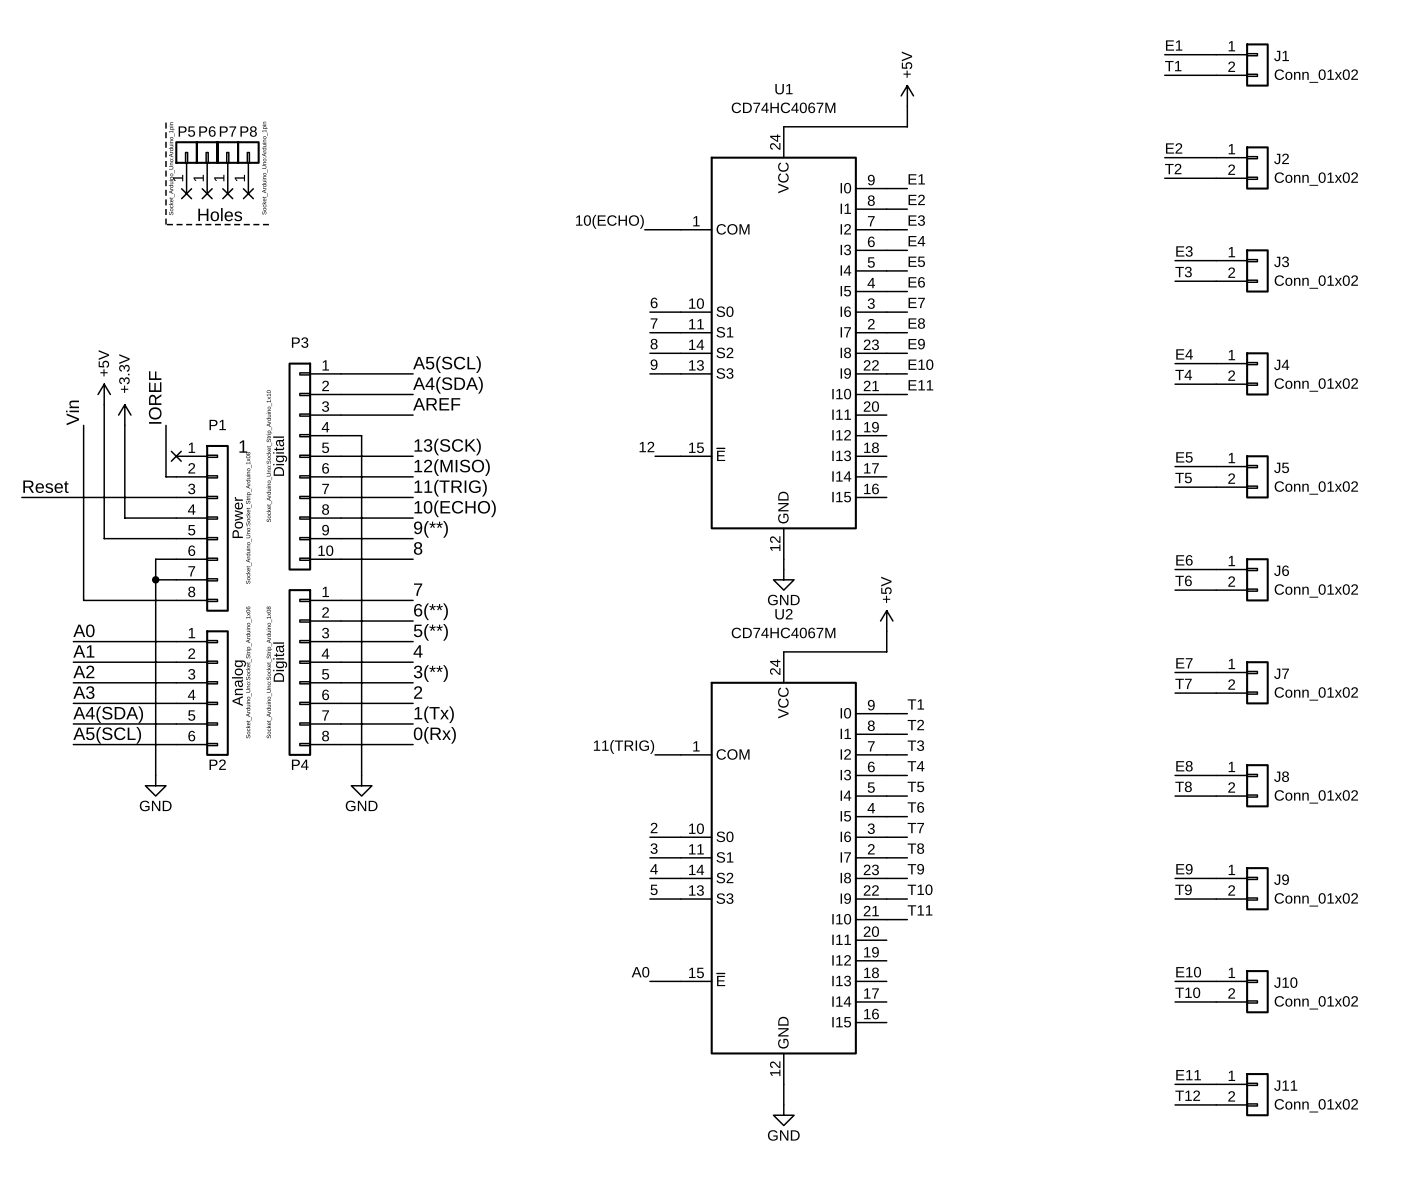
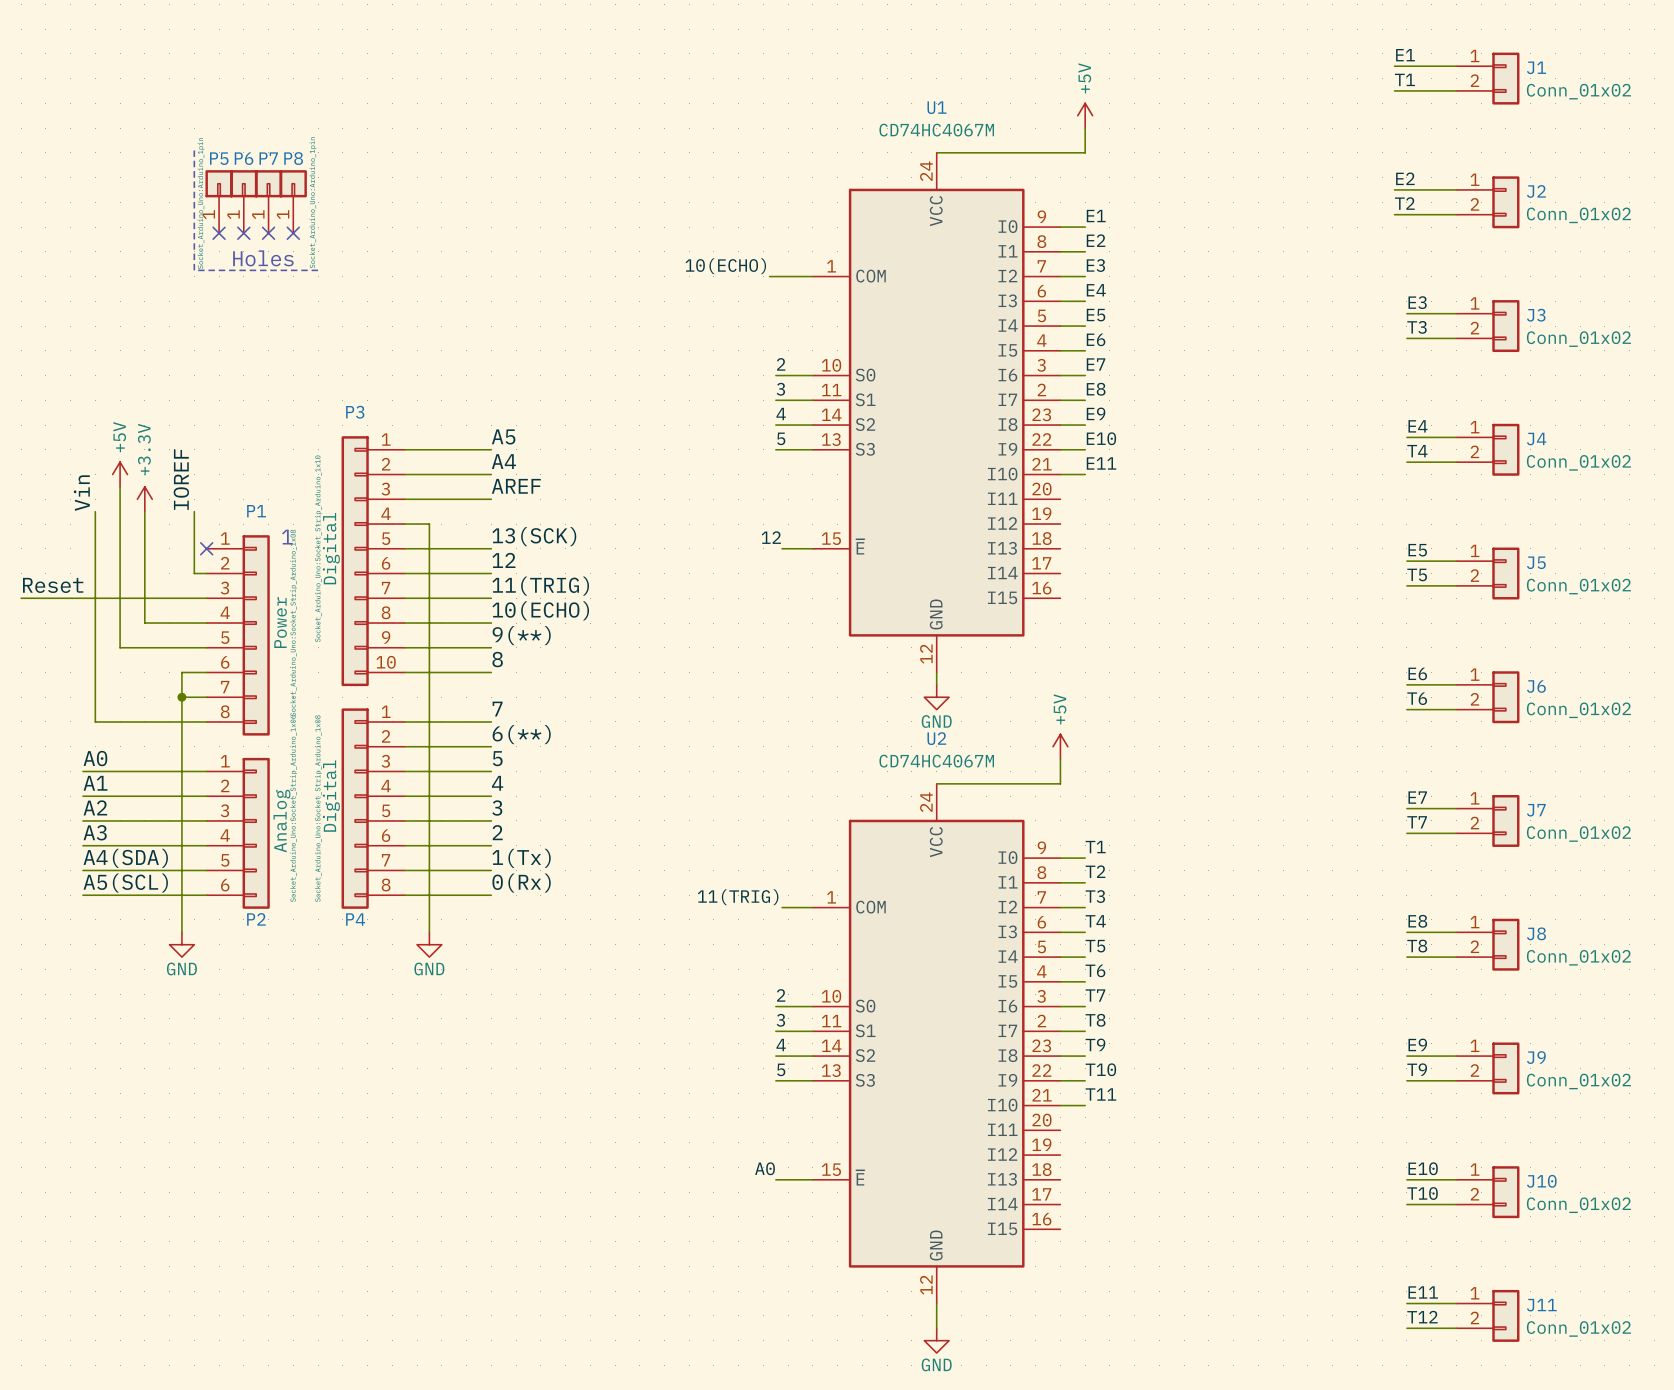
label: 6 (654, 302) -> 2 (781, 364)
label: 7 (654, 323) -> 3 (780, 389)
label: 8 (654, 344) -> 4 (781, 413)
label: A5(SCL) (447, 364) -> A5 (503, 436)
label: 9 (654, 364) -> 5 (781, 438)
label: A4(SDA) (447, 385) -> A4 (503, 461)
label: 12(MISO) (452, 467) -> 12 (503, 560)
label: 5(**) (430, 632) -> 5 (497, 758)
label: 3(**) (430, 673) -> 3 (497, 808)

